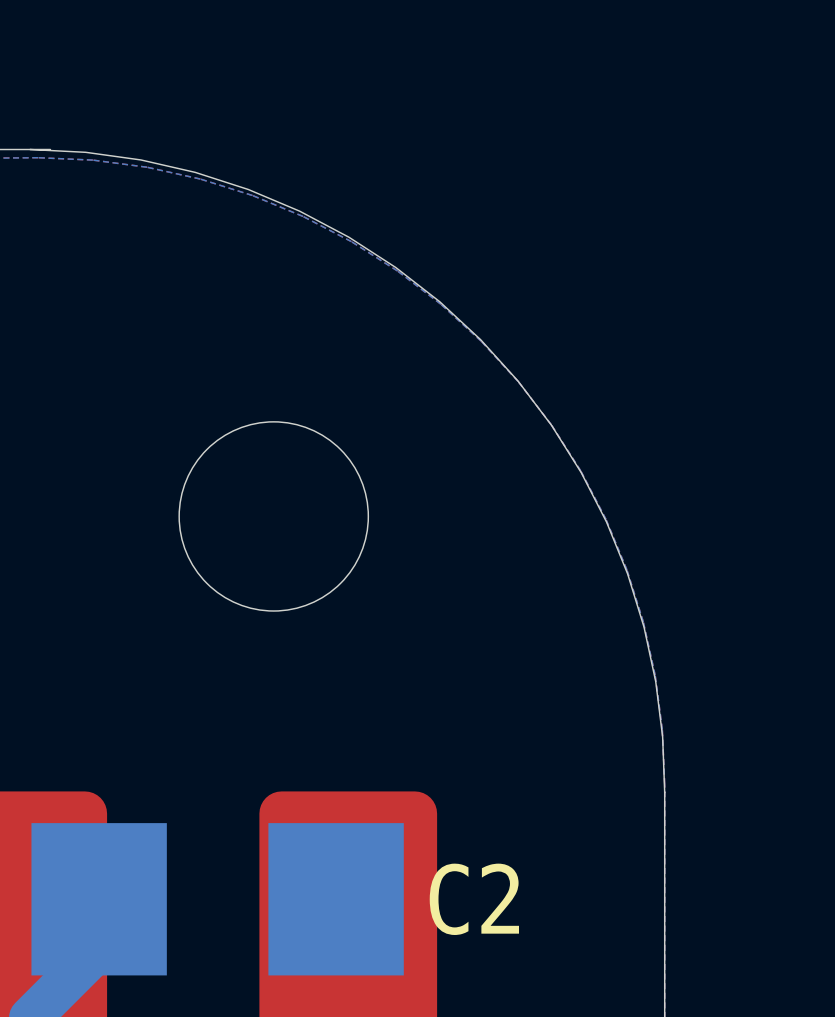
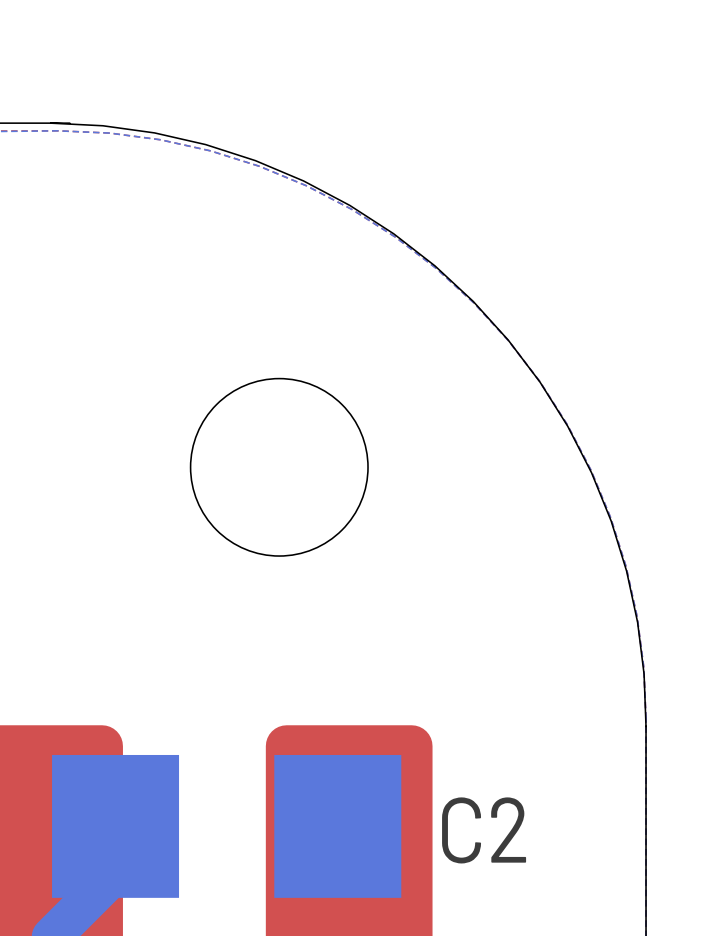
C2 name position: C2 (474, 899) -> C2 (484, 830)

